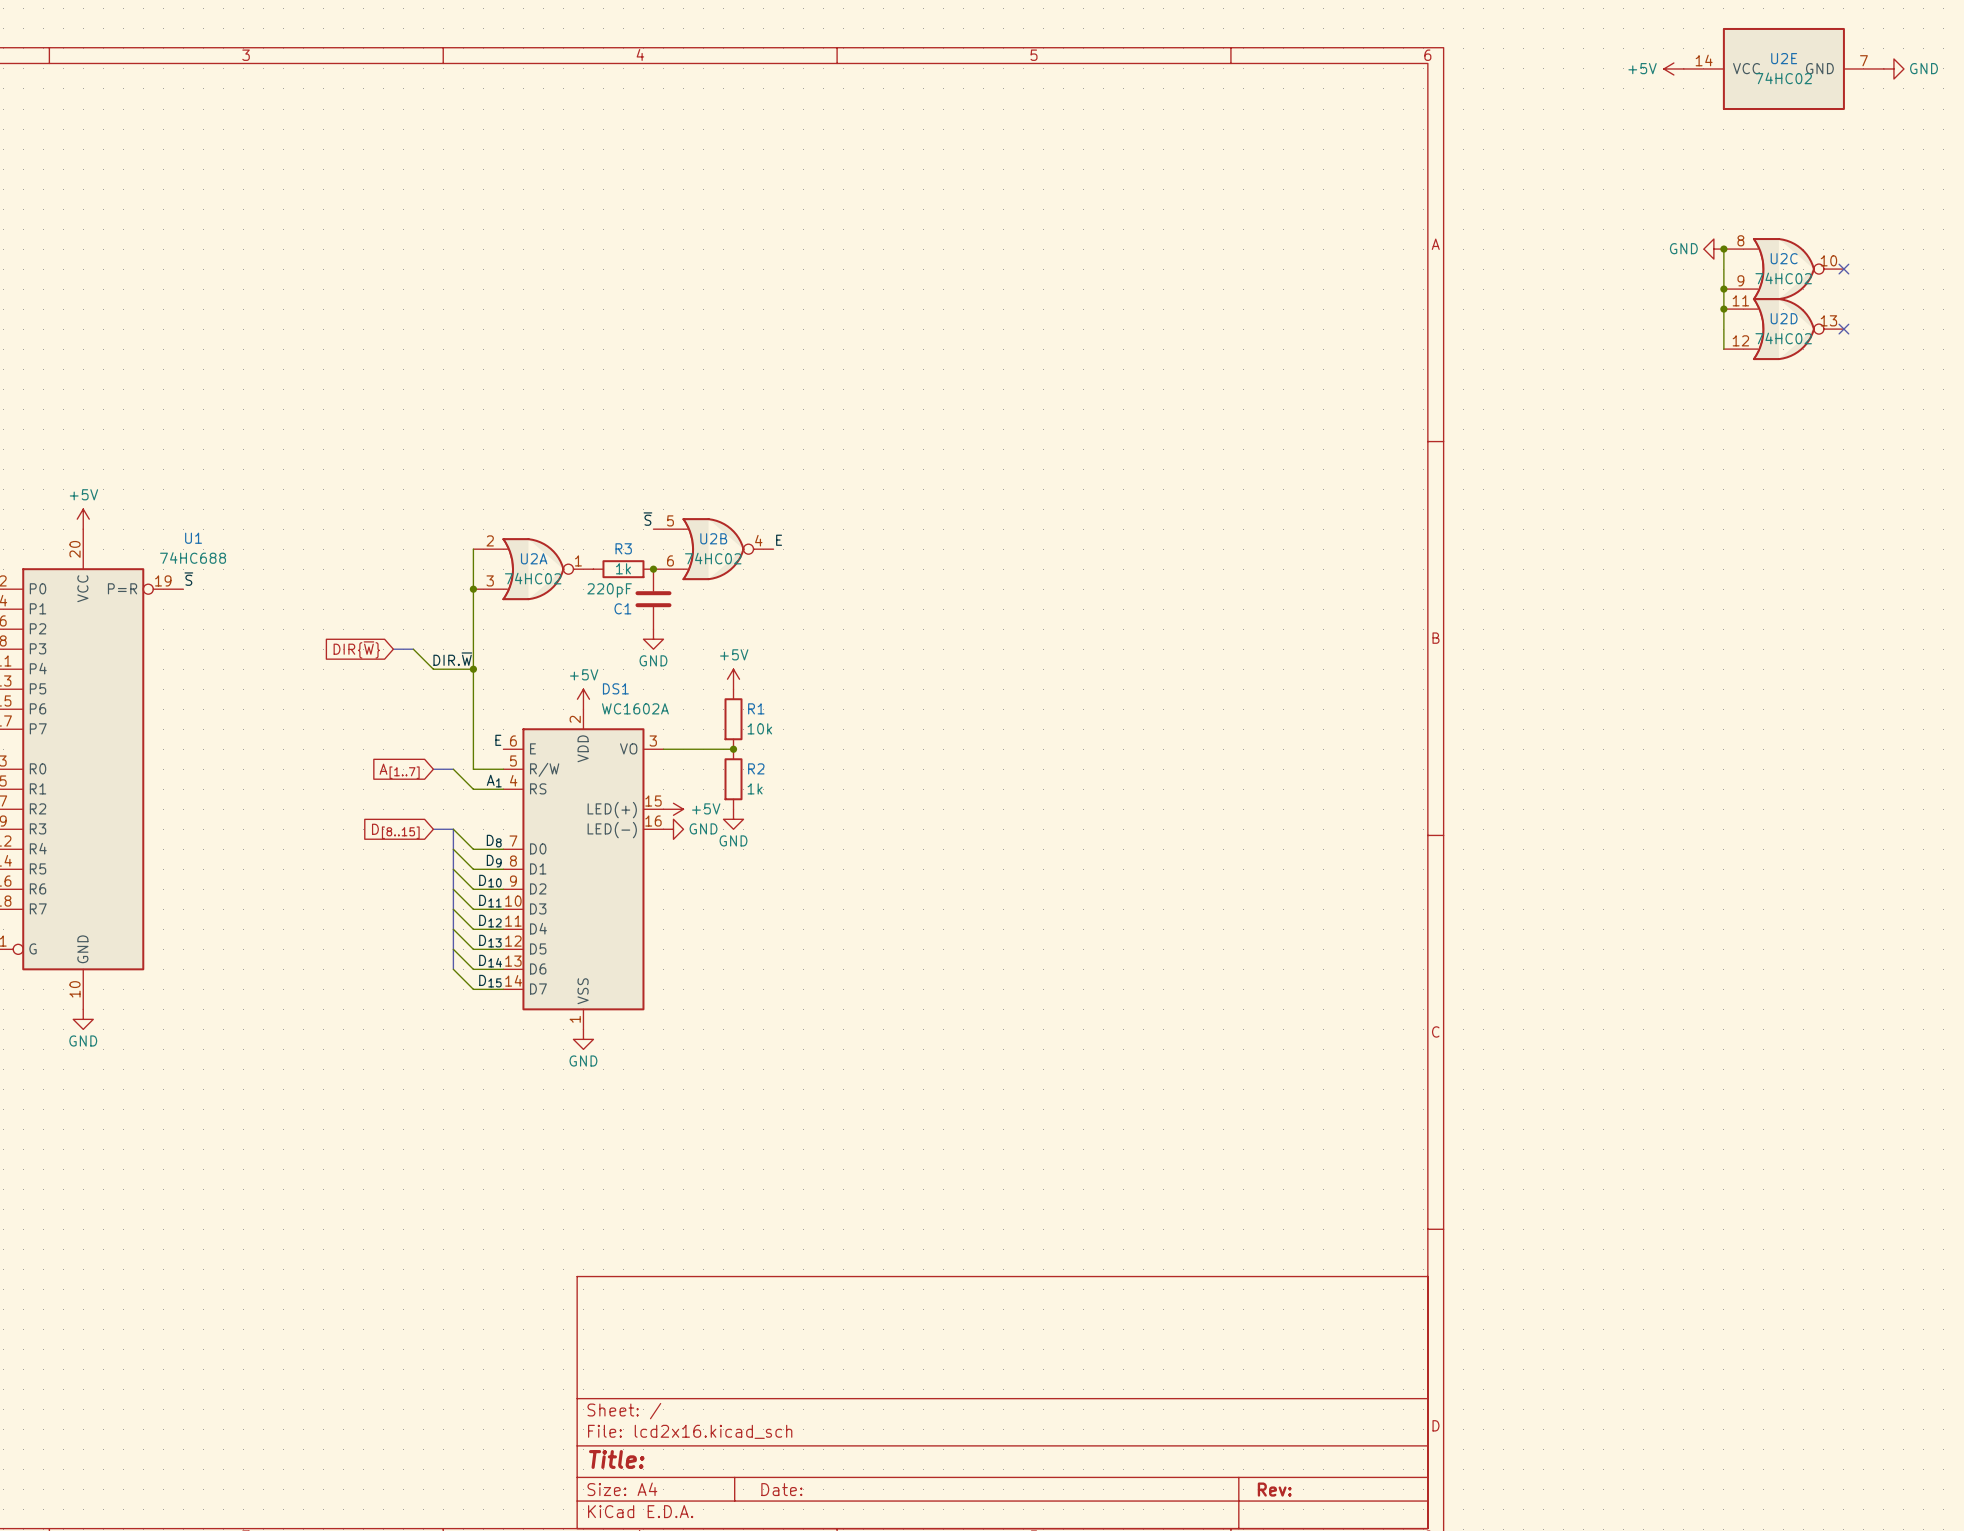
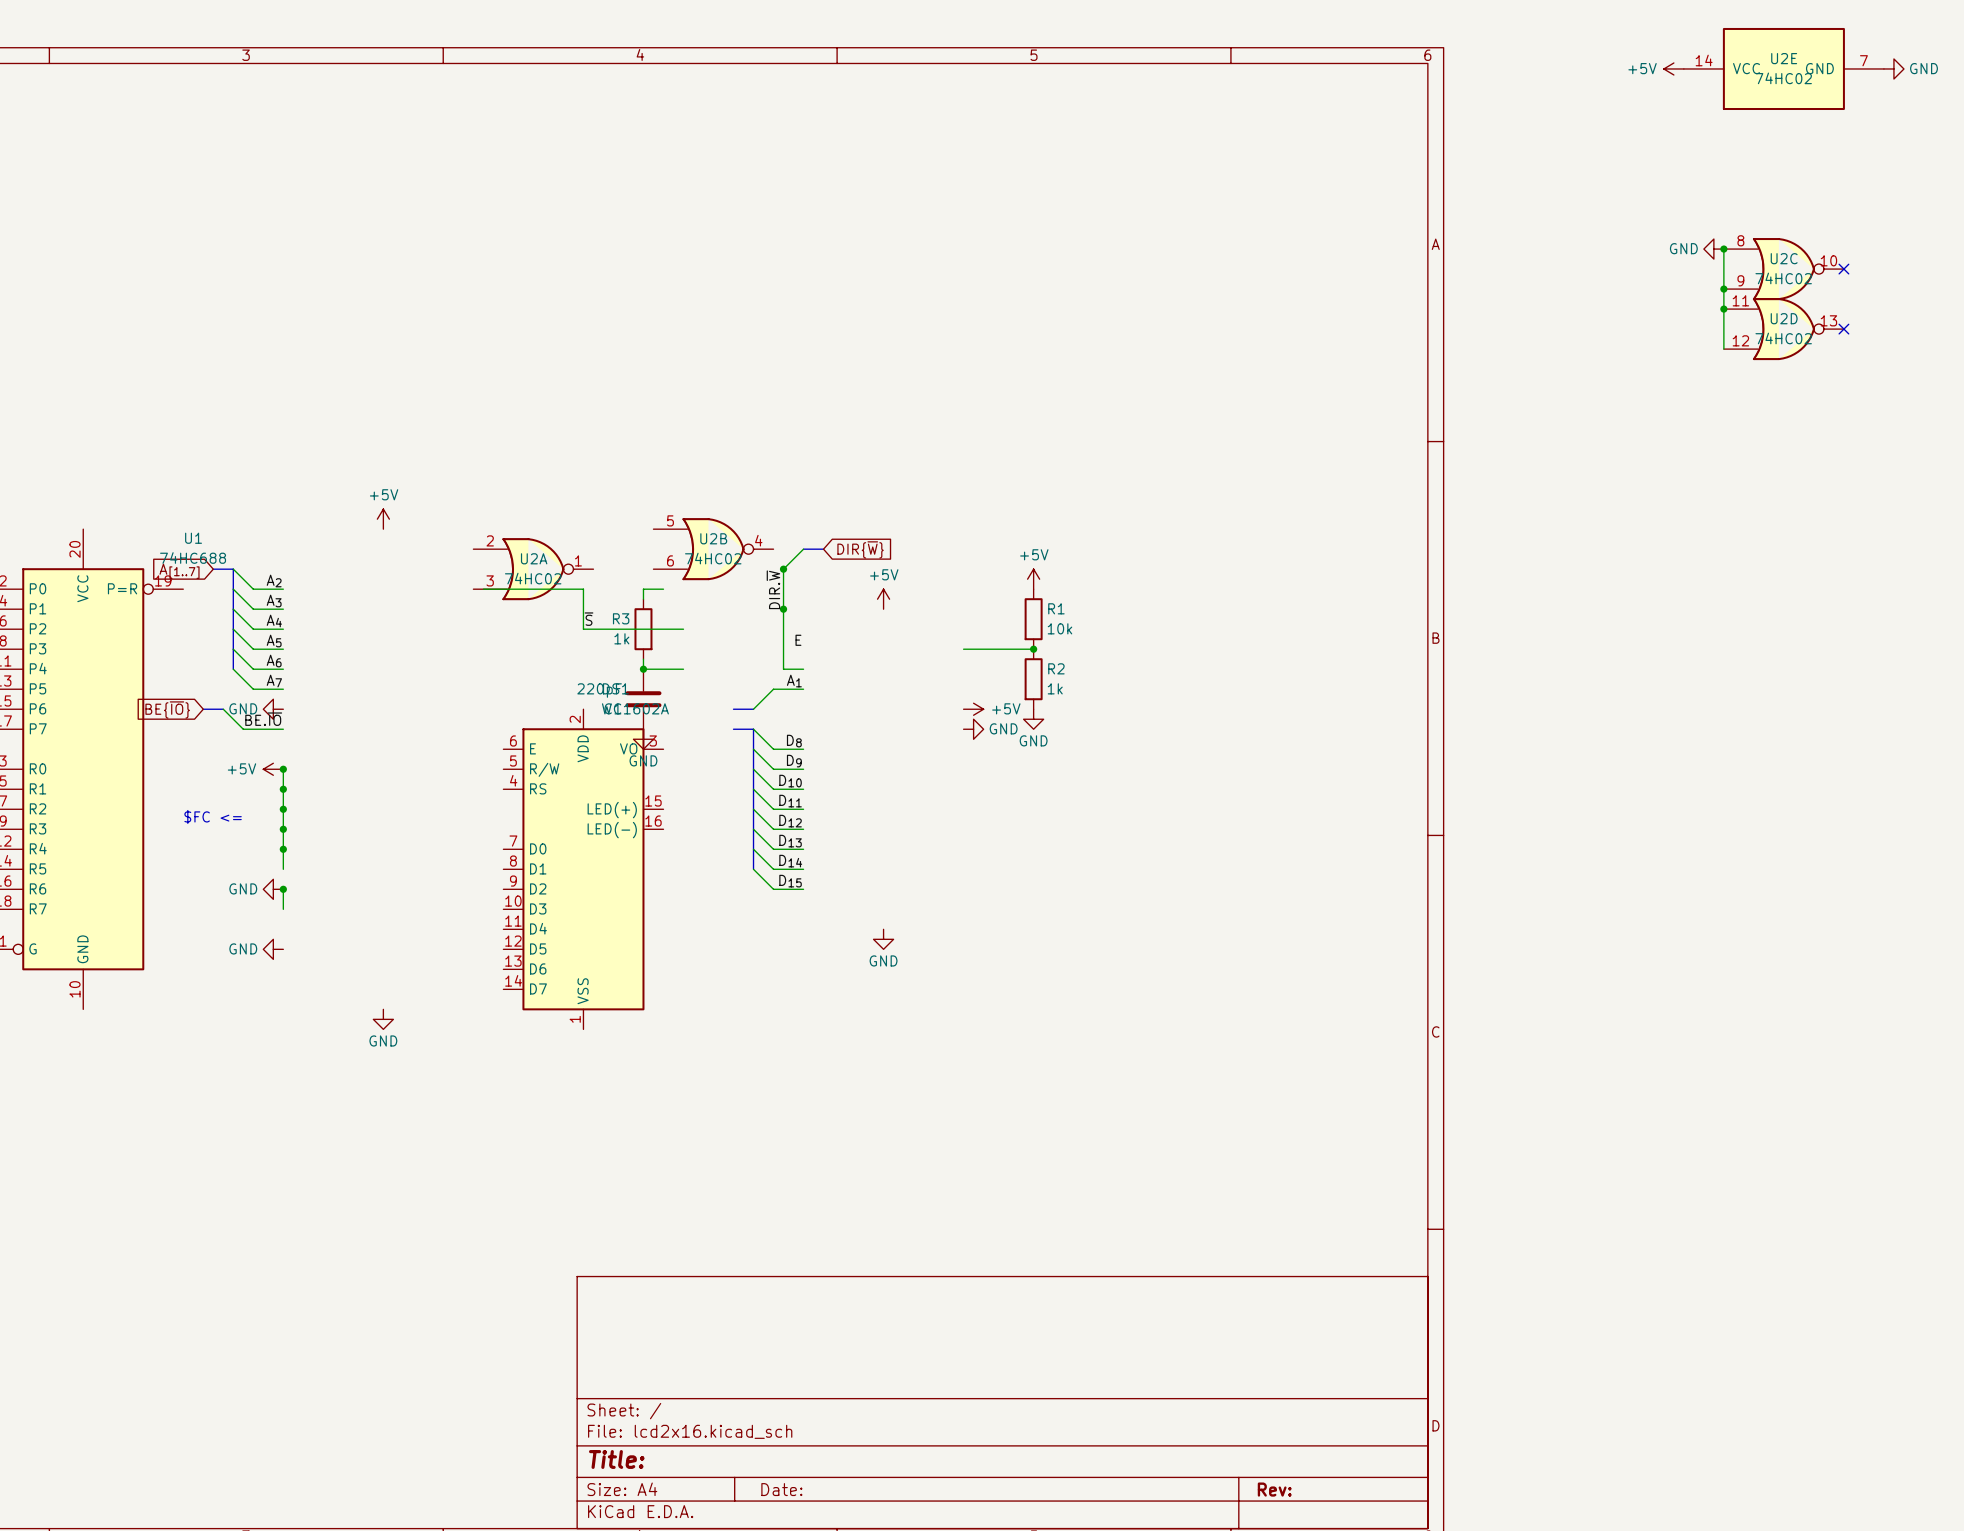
power symbol: +5V (83, 519) -> none
power symbol: none -> +5V (383, 519)
label position: ~{S} (647, 519) -> ~{S} (589, 619)
label position: E (779, 540) -> E (798, 640)
R3 name position: R3 (623, 548) -> R3 (621, 618)
wire: (473, 549) (473, 769) (503, 769) -> none
wire: none -> (803, 549) (783, 569) (783, 669) (803, 669)
bus: none -> (803, 549) (823, 549)
global label: none -> DIR{~{W}} (860, 549)
R3 value position: 1k (623, 568) -> 1k (621, 638)
bus: none -> (213, 569) (233, 569) (233, 669)
wire: none -> (233, 569) (253, 589) (283, 589)
R3 rotation: 0° (623, 569) -> 90° clockwise (643, 629)
R3 position: (623, 569) -> (643, 629)
junction: (653, 569) -> none
junction: none -> (783, 569)
global label: none -> A[1..7] (179, 571)
label: ~{S} (188, 579) -> none
power symbol: none -> +5V (1033, 579)
label: none -> A2 (274, 581)
wire: none -> (233, 589) (253, 609) (283, 609)
junction: (473, 589) -> none
wire: none -> (483, 589) (583, 589) (583, 629) (683, 629)
wire: none -> (663, 589) (643, 589) (643, 599)
label: none -> DIR.~{W} (773, 589)
C1 position: (653, 599) -> (643, 699)
power symbol: none -> +5V (883, 599)
label: none -> A3 (274, 601)
wire: none -> (233, 609) (253, 629) (283, 629)
junction: none -> (783, 609)
label: none -> A4 (274, 621)
wire: none -> (233, 629) (253, 649) (283, 649)
power symbol: GND (653, 639) -> none
label: none -> A5 (274, 641)
wire: none -> (233, 649) (253, 669) (283, 669)
global label: DIR{~{W}} (356, 649) -> none
bus: (393, 649) (413, 649) -> none
wire: (413, 649) (433, 669) (473, 669) -> none
wire: none -> (963, 649) (1033, 649)
junction: none -> (1033, 649)
label: DIR.~{W} (452, 659) -> none
wire: none -> (643, 659) (643, 669) (683, 669)
label: none -> A6 (274, 661)
wire: none -> (233, 669) (253, 689) (283, 689)
junction: (473, 669) -> none
junction: none -> (643, 669)
power symbol: +5V (733, 679) -> none
label: none -> A7 (274, 681)
label: none -> A1 (794, 681)
wire: none -> (803, 689) (773, 689) (753, 709)
power symbol: +5V (583, 699) -> none
global label: none -> BE{~{IO}} (167, 709)
bus: none -> (203, 709) (223, 709)
wire: none -> (223, 709) (243, 729) (283, 729)
power symbol: none -> GND (273, 709)
bus: none -> (733, 709) (753, 709)
power symbol: none -> +5V (973, 709)
label: none -> BE.~{IO} (263, 719)
R1 position: (733, 719) -> (1033, 619)
power symbol: none -> GND (1033, 719)
bus: none -> (733, 729) (753, 729) (753, 869)
wire: none -> (753, 729) (773, 749) (803, 749)
power symbol: none -> GND (973, 729)
power symbol: none -> GND (643, 739)
label: E (498, 740) -> none
label: none -> D8 (794, 741)
wire: (663, 749) (733, 749) -> none
junction: (733, 749) -> none
wire: none -> (753, 749) (773, 769) (803, 769)
label: none -> D9 (794, 761)
power symbol: none -> +5V (273, 769)
wire: none -> (283, 769) (283, 869)
junction: none -> (283, 769)
bus: (433, 769) (453, 769) -> none
wire: (453, 769) (473, 789) (503, 789) -> none
wire: none -> (753, 769) (773, 789) (803, 789)
global label: A[1..7] (399, 771) -> none
R2 position: (733, 779) -> (1033, 679)
label: A1 (494, 781) -> none
label: none -> D10 (790, 781)
junction: none -> (283, 789)
wire: none -> (753, 789) (773, 809) (803, 809)
label: none -> D11 (790, 801)
junction: none -> (283, 809)
power symbol: +5V (673, 809) -> none
wire: none -> (753, 809) (773, 829) (803, 829)
text: none -> $FC <= (213, 816)
power symbol: GND (733, 819) -> none
label: none -> D12 (790, 821)
junction: none -> (283, 829)
bus: (433, 829) (453, 829) (453, 969) -> none
wire: (453, 829) (473, 849) (503, 849) -> none
power symbol: GND (673, 829) -> none
wire: none -> (753, 829) (773, 849) (803, 849)
global label: D[8..15] (395, 831) -> none
label: D8 (494, 841) -> none
label: none -> D13 (790, 841)
junction: none -> (283, 849)
wire: (453, 849) (473, 869) (503, 869) -> none
wire: none -> (753, 849) (773, 869) (803, 869)
label: D9 (494, 861) -> none
label: none -> D14 (790, 861)
wire: (453, 869) (473, 889) (503, 889) -> none
wire: none -> (753, 869) (773, 889) (803, 889)
label: D10 (490, 881) -> none
label: none -> D15 (790, 881)
power symbol: none -> GND (273, 889)
wire: none -> (283, 889) (283, 909)
junction: none -> (283, 889)
wire: (453, 889) (473, 909) (503, 909) -> none
label: D11 (490, 901) -> none
wire: (453, 909) (473, 929) (503, 929) -> none
label: D12 (490, 921) -> none
wire: (453, 929) (473, 949) (503, 949) -> none
power symbol: none -> GND (883, 939)
label: D13 (490, 941) -> none
power symbol: none -> GND (273, 949)
wire: (453, 949) (473, 969) (503, 969) -> none
label: D14 (490, 961) -> none
wire: (453, 969) (473, 989) (503, 989) -> none
label: D15 (490, 981) -> none
power symbol: GND (83, 1019) -> none
power symbol: none -> GND (383, 1019)
power symbol: GND (583, 1039) -> none

